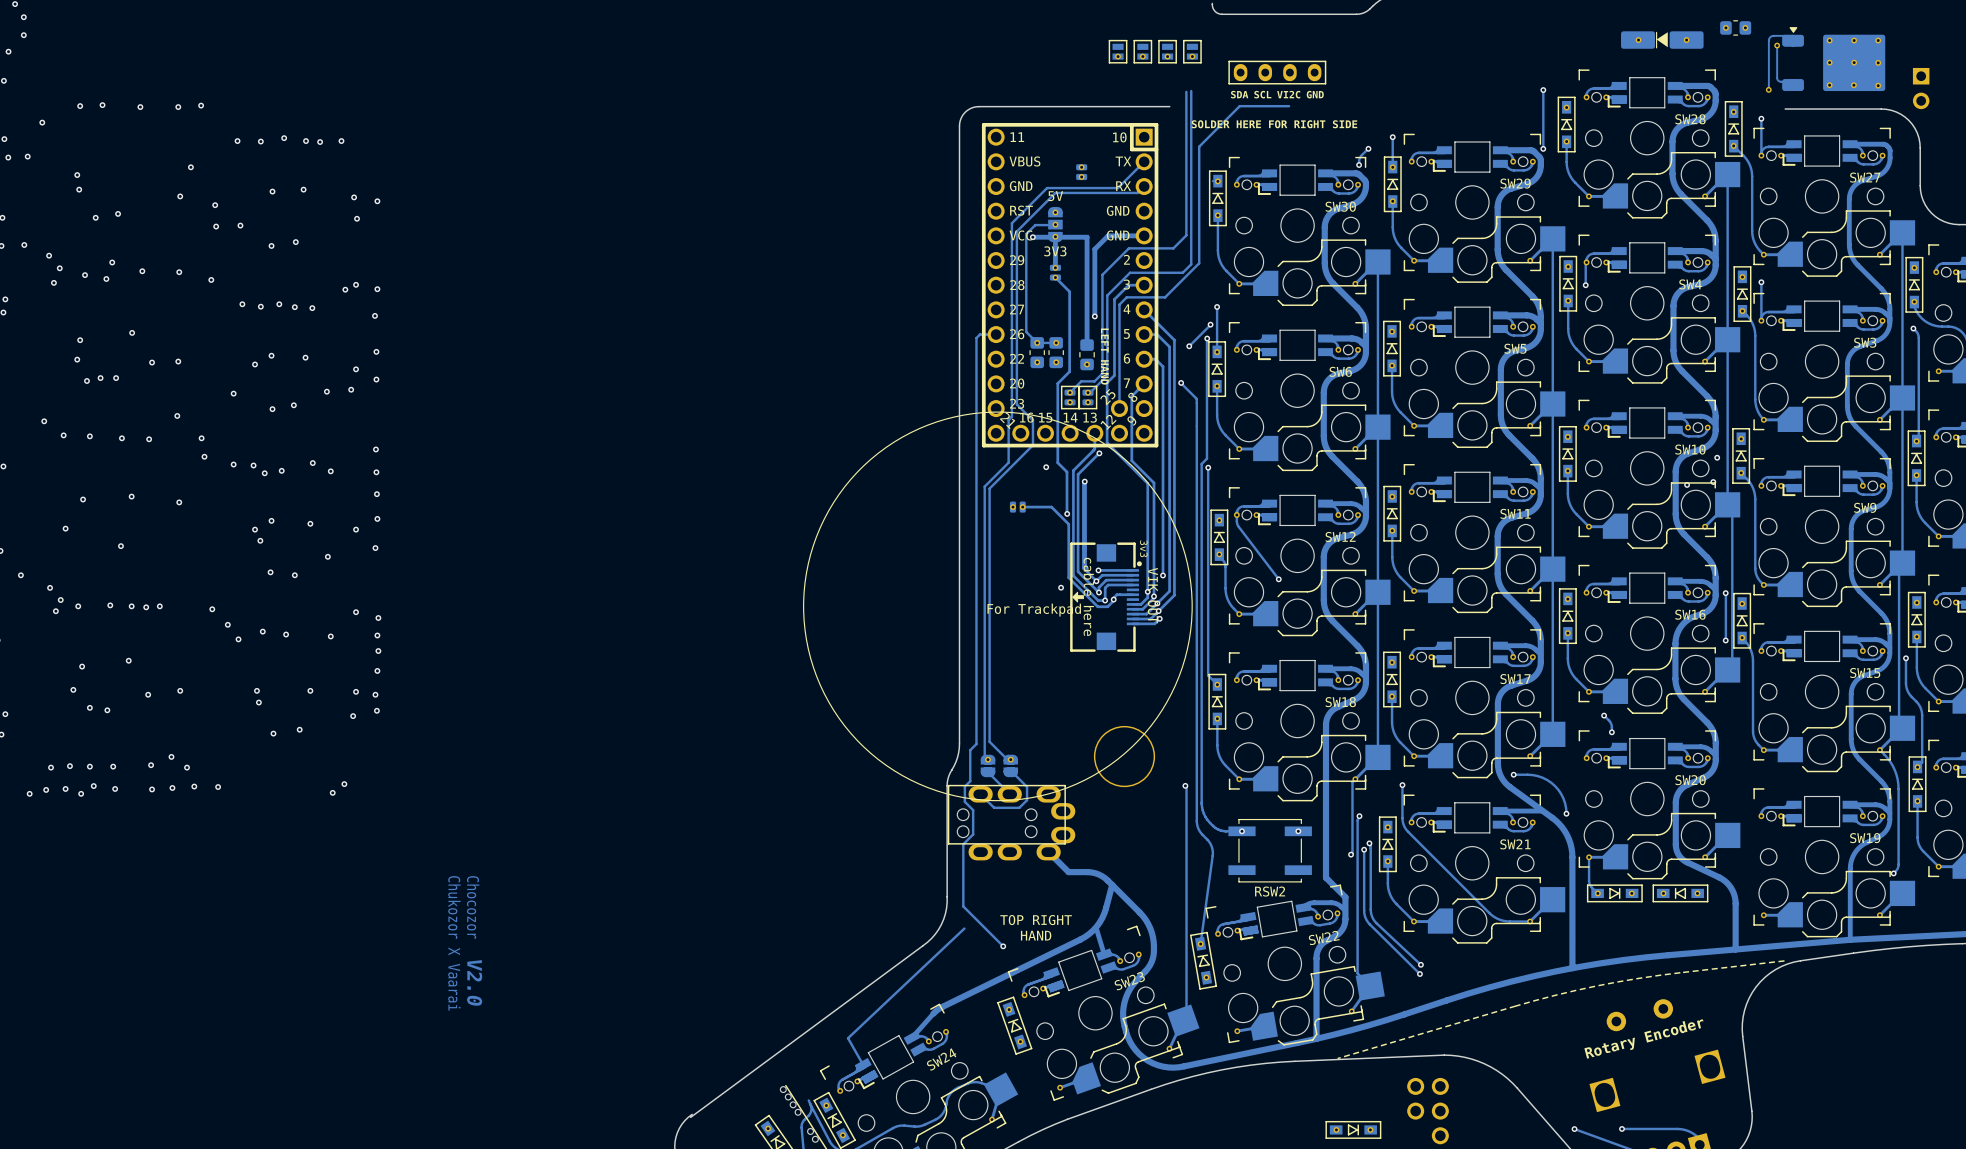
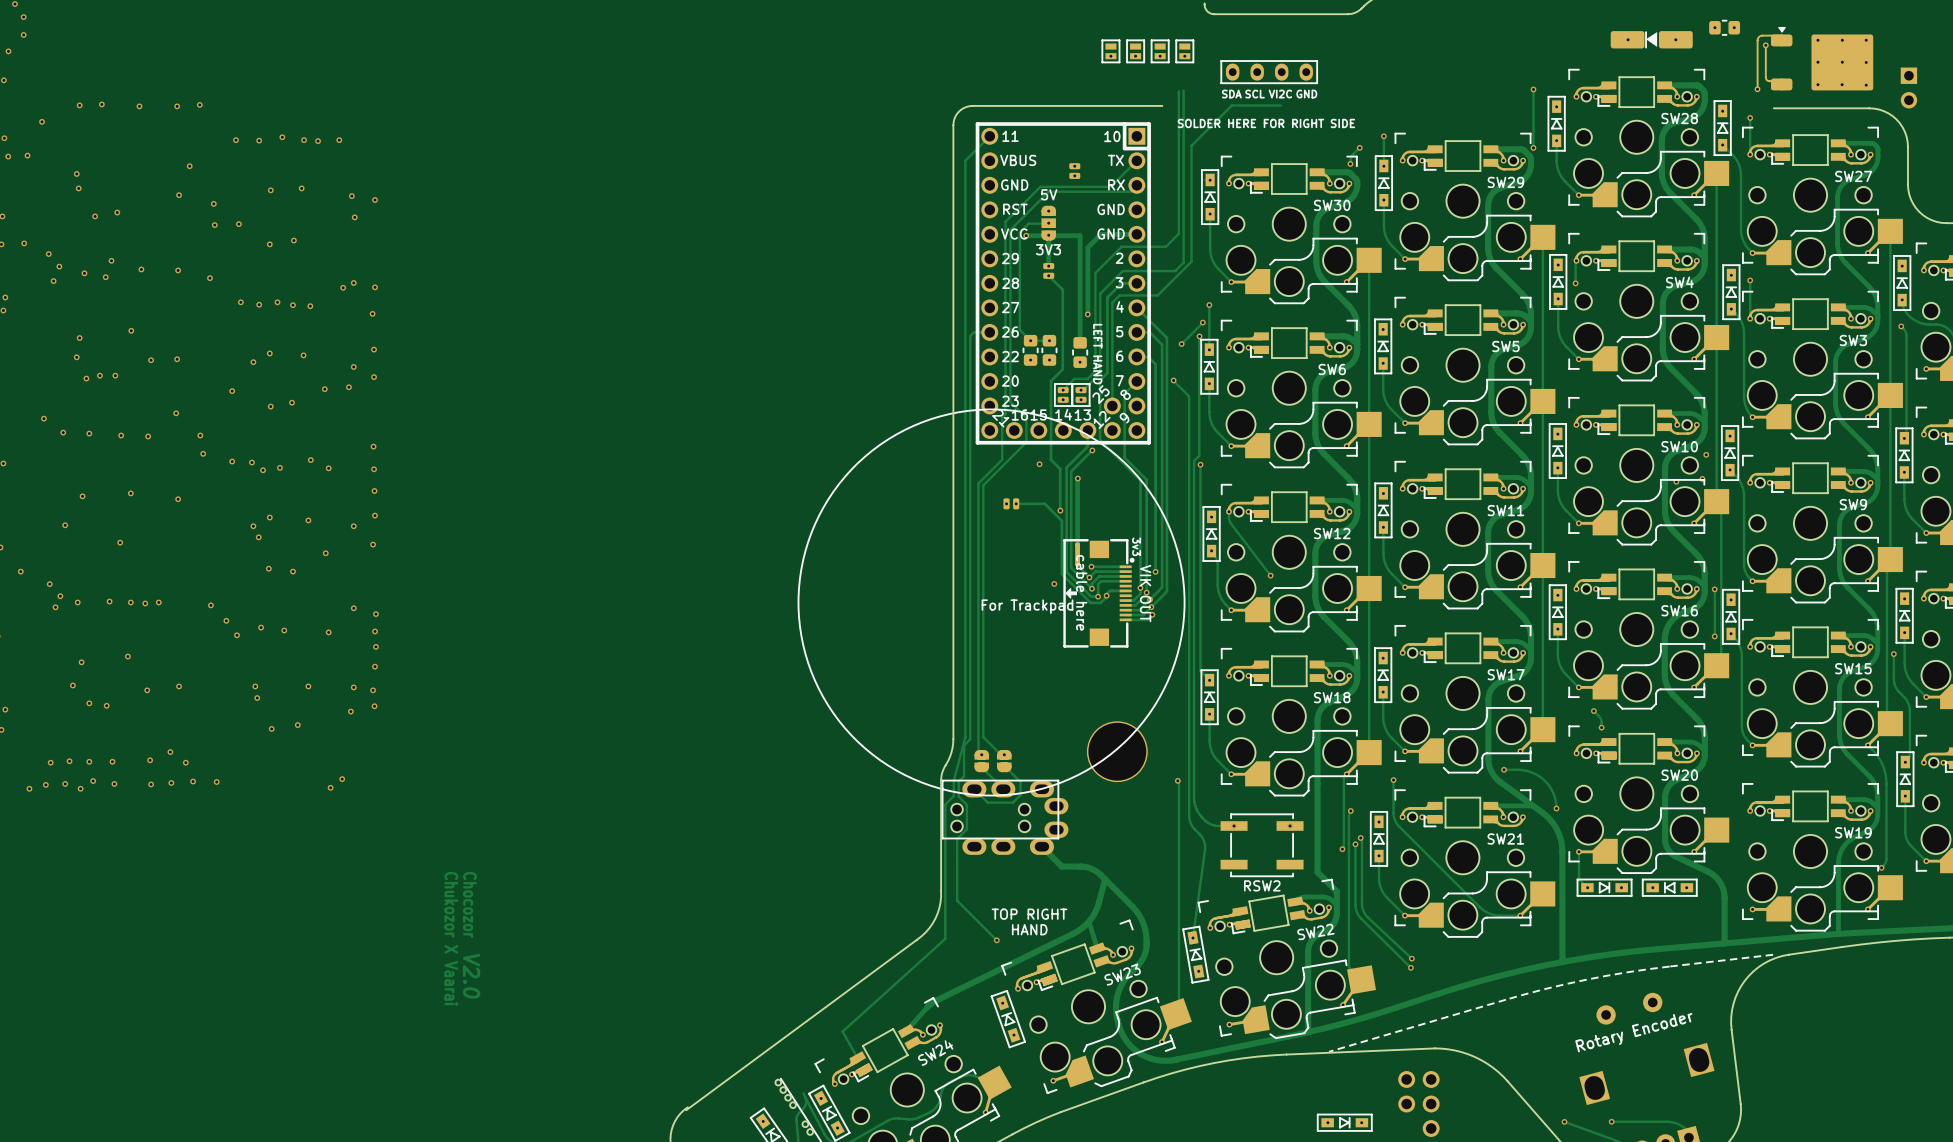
track: (964, 928) (848, 1038) -> (989, 136) (965, 160) (965, 737) (953, 780) (953, 796) (945, 804) (945, 938) (842, 1031)

